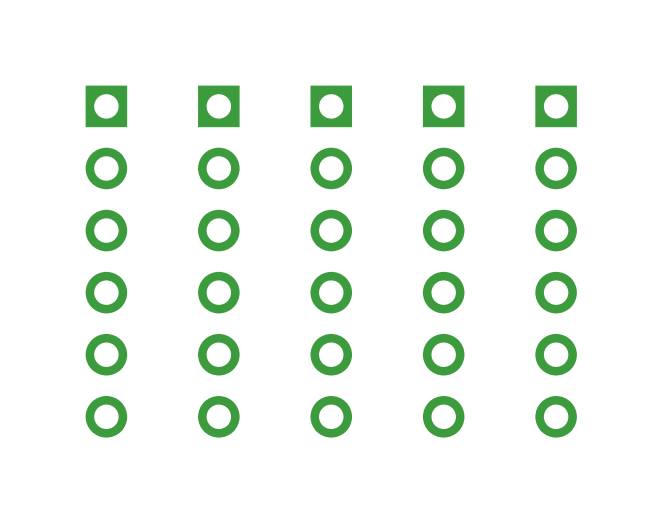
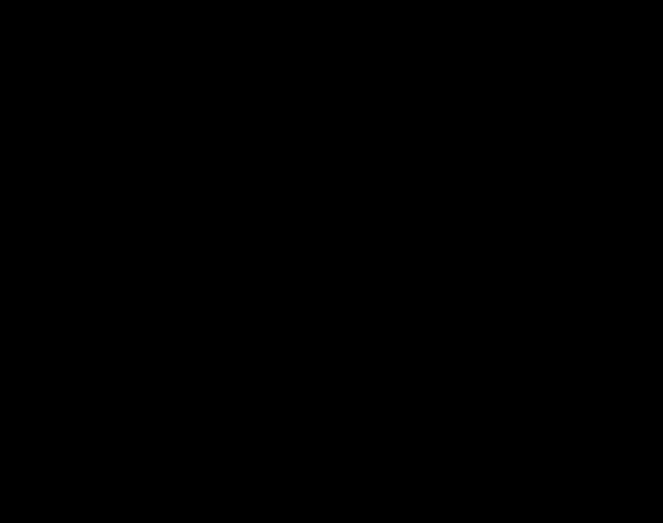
part: (106, 261) -> none
part: (218, 261) -> none
part: (331, 261) -> none
part: (443, 261) -> none
part: (556, 261) -> none

